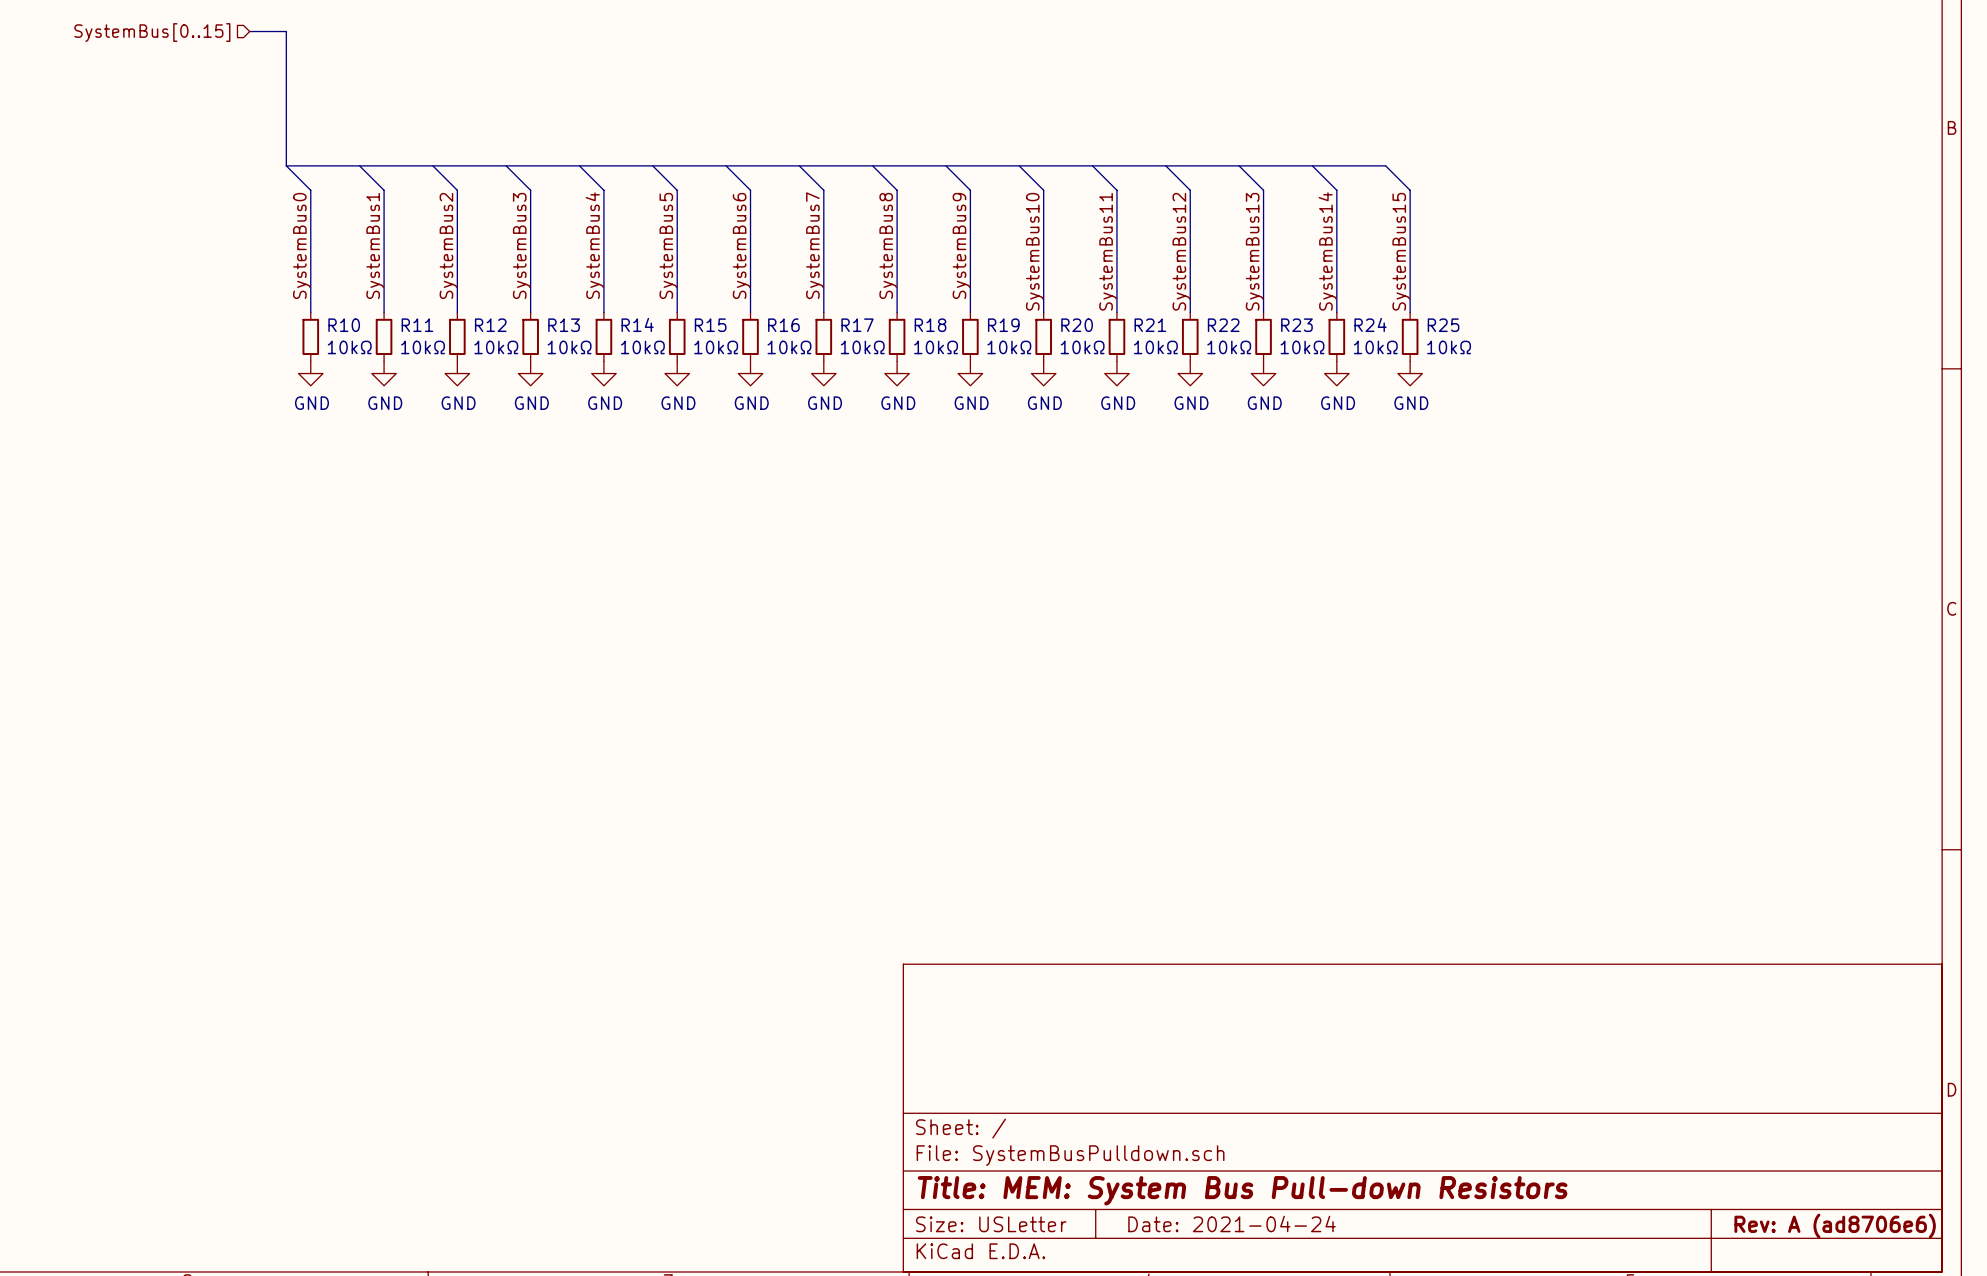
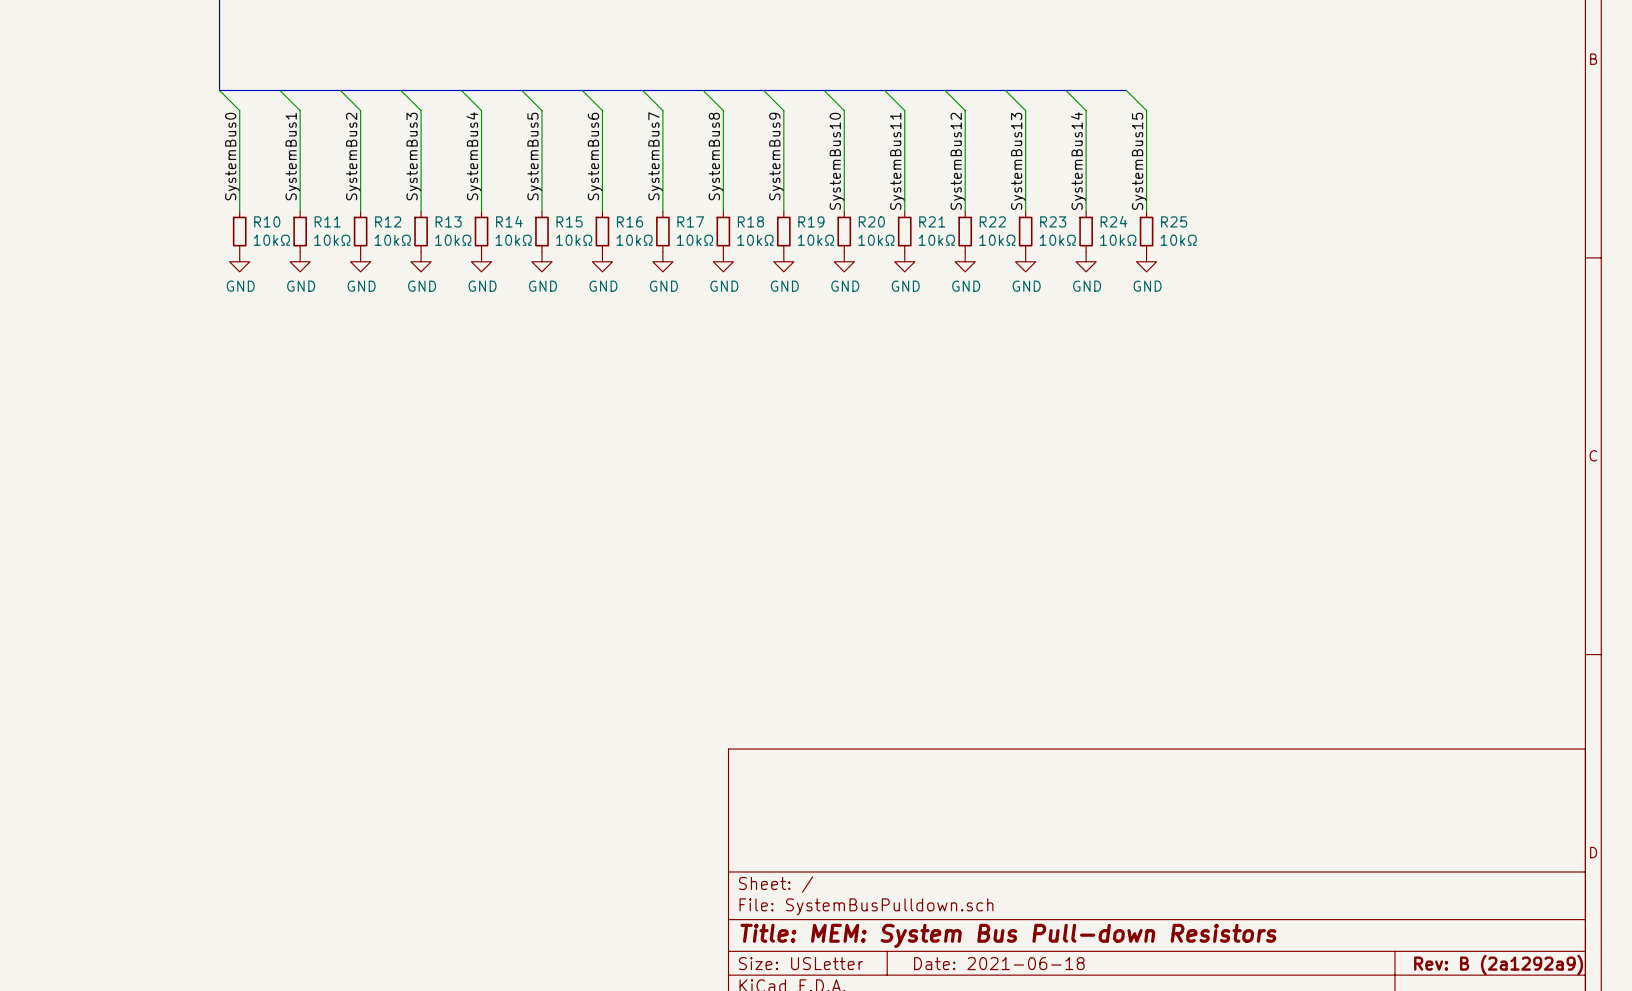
title block: Date: 2021-04-24 (1232, 1223) -> Date: 2021-06-18 (999, 963)
title block: Rev: A (ad8706e6) (1835, 1226) -> Rev: B (2a1292a9) (1498, 965)

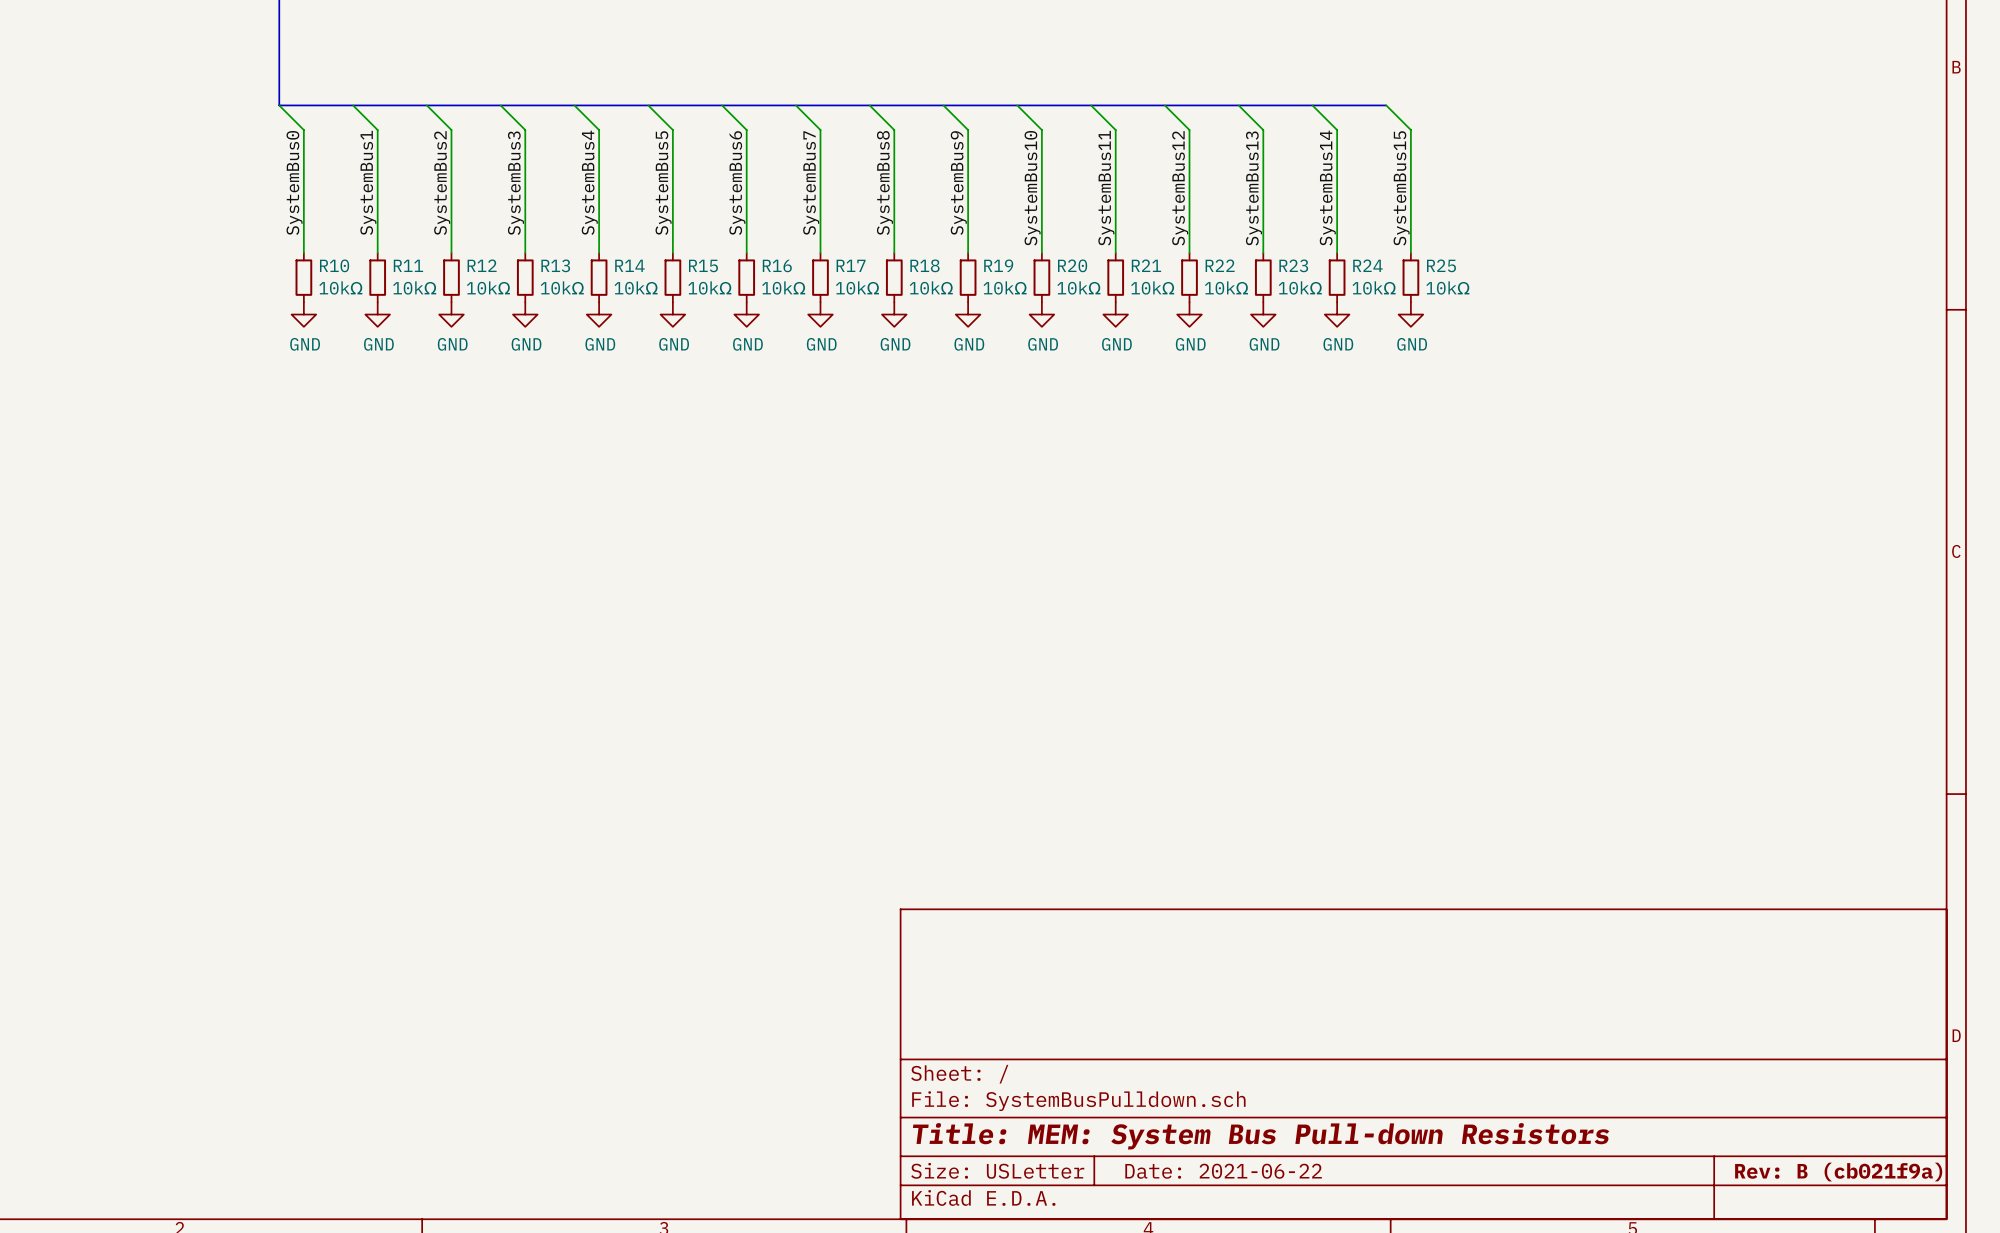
title block: Date: 2021-06-18 (999, 963) -> Date: 2021-06-22 (1223, 1171)
title block: Rev: B (2a1292a9) (1498, 965) -> Rev: B (cb021f9a) (1838, 1172)

